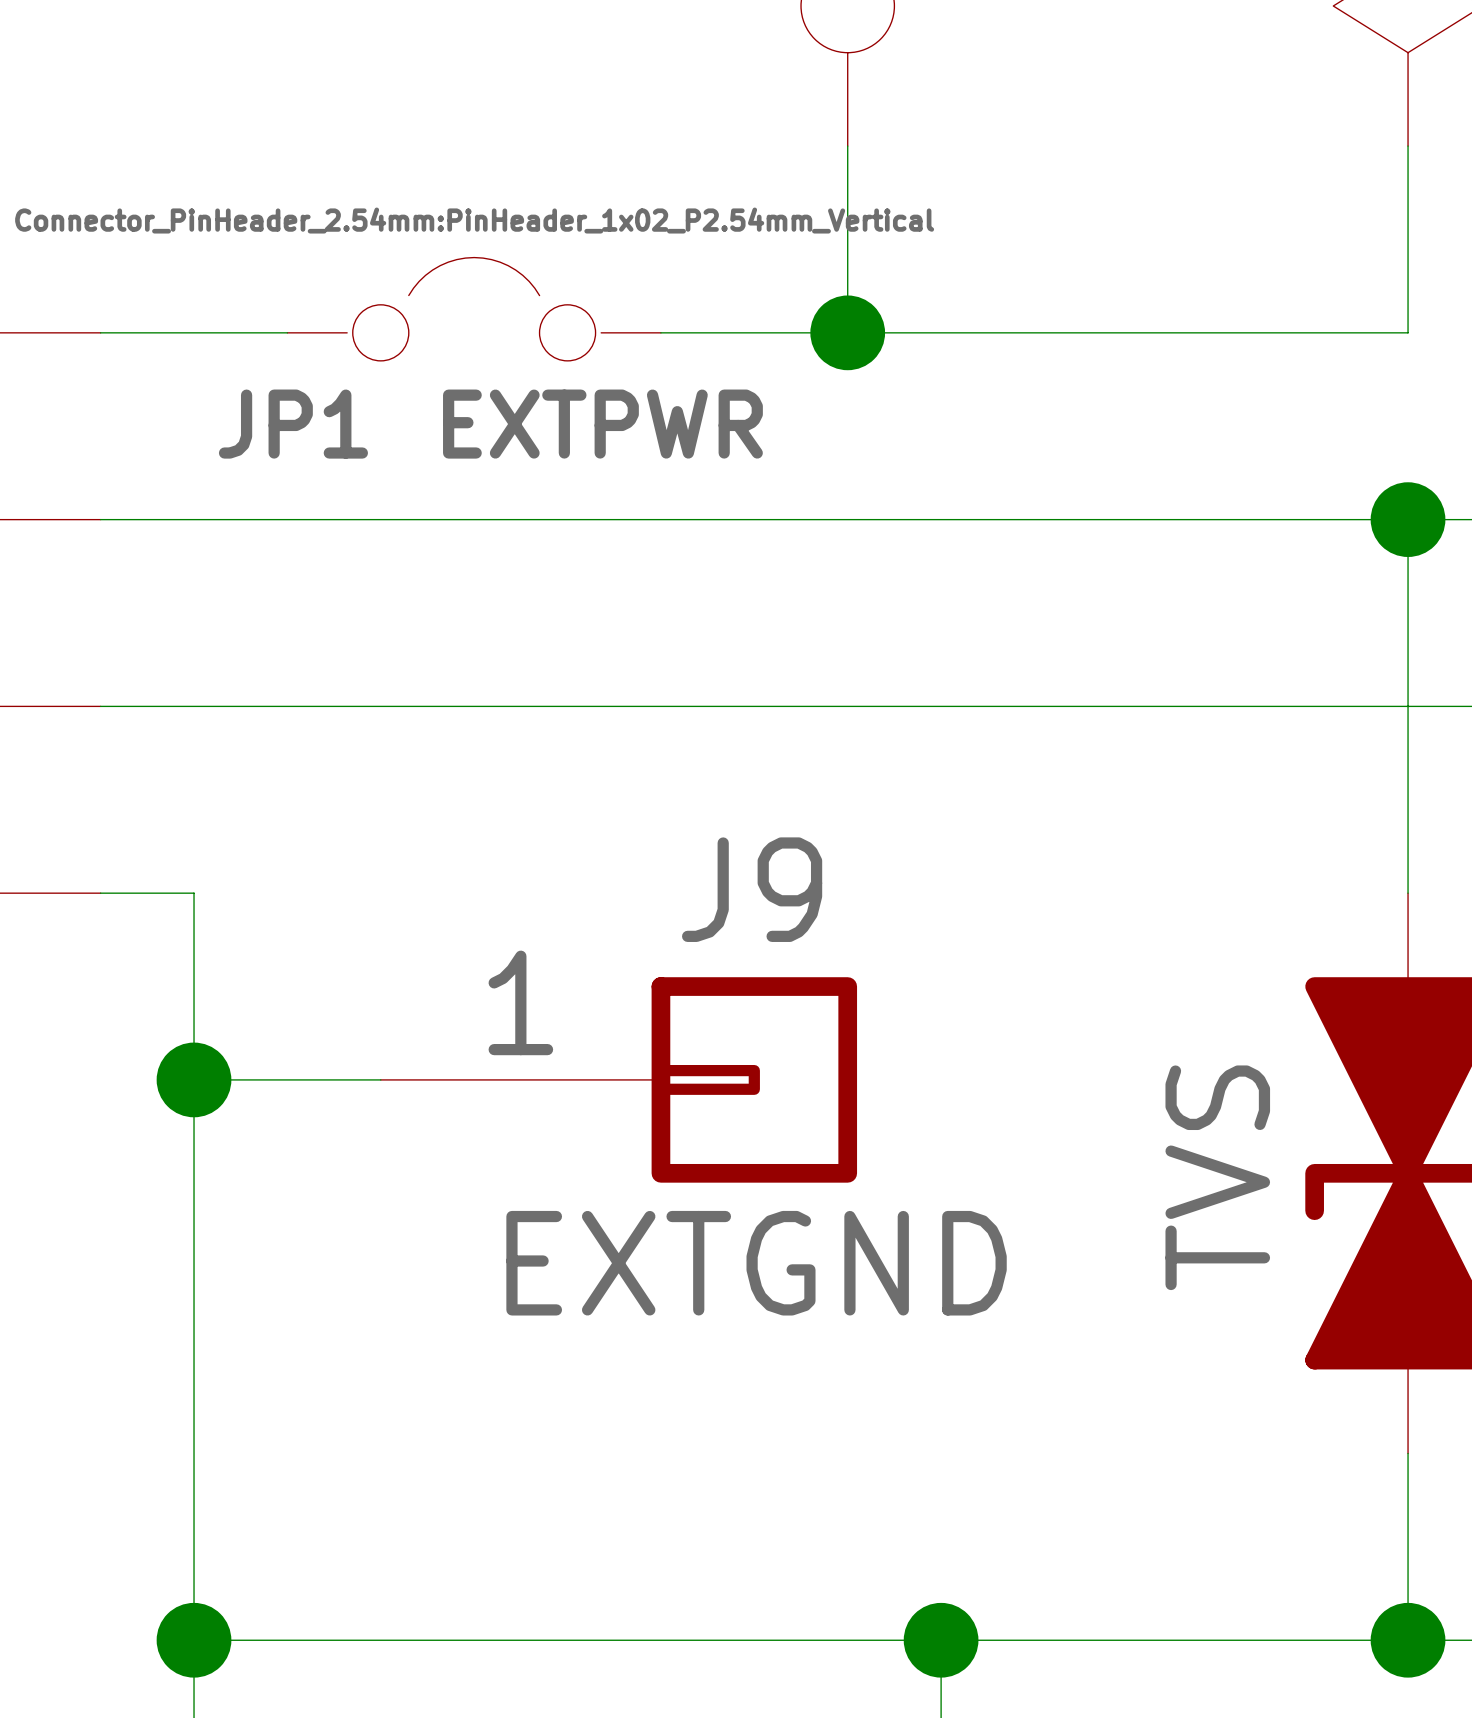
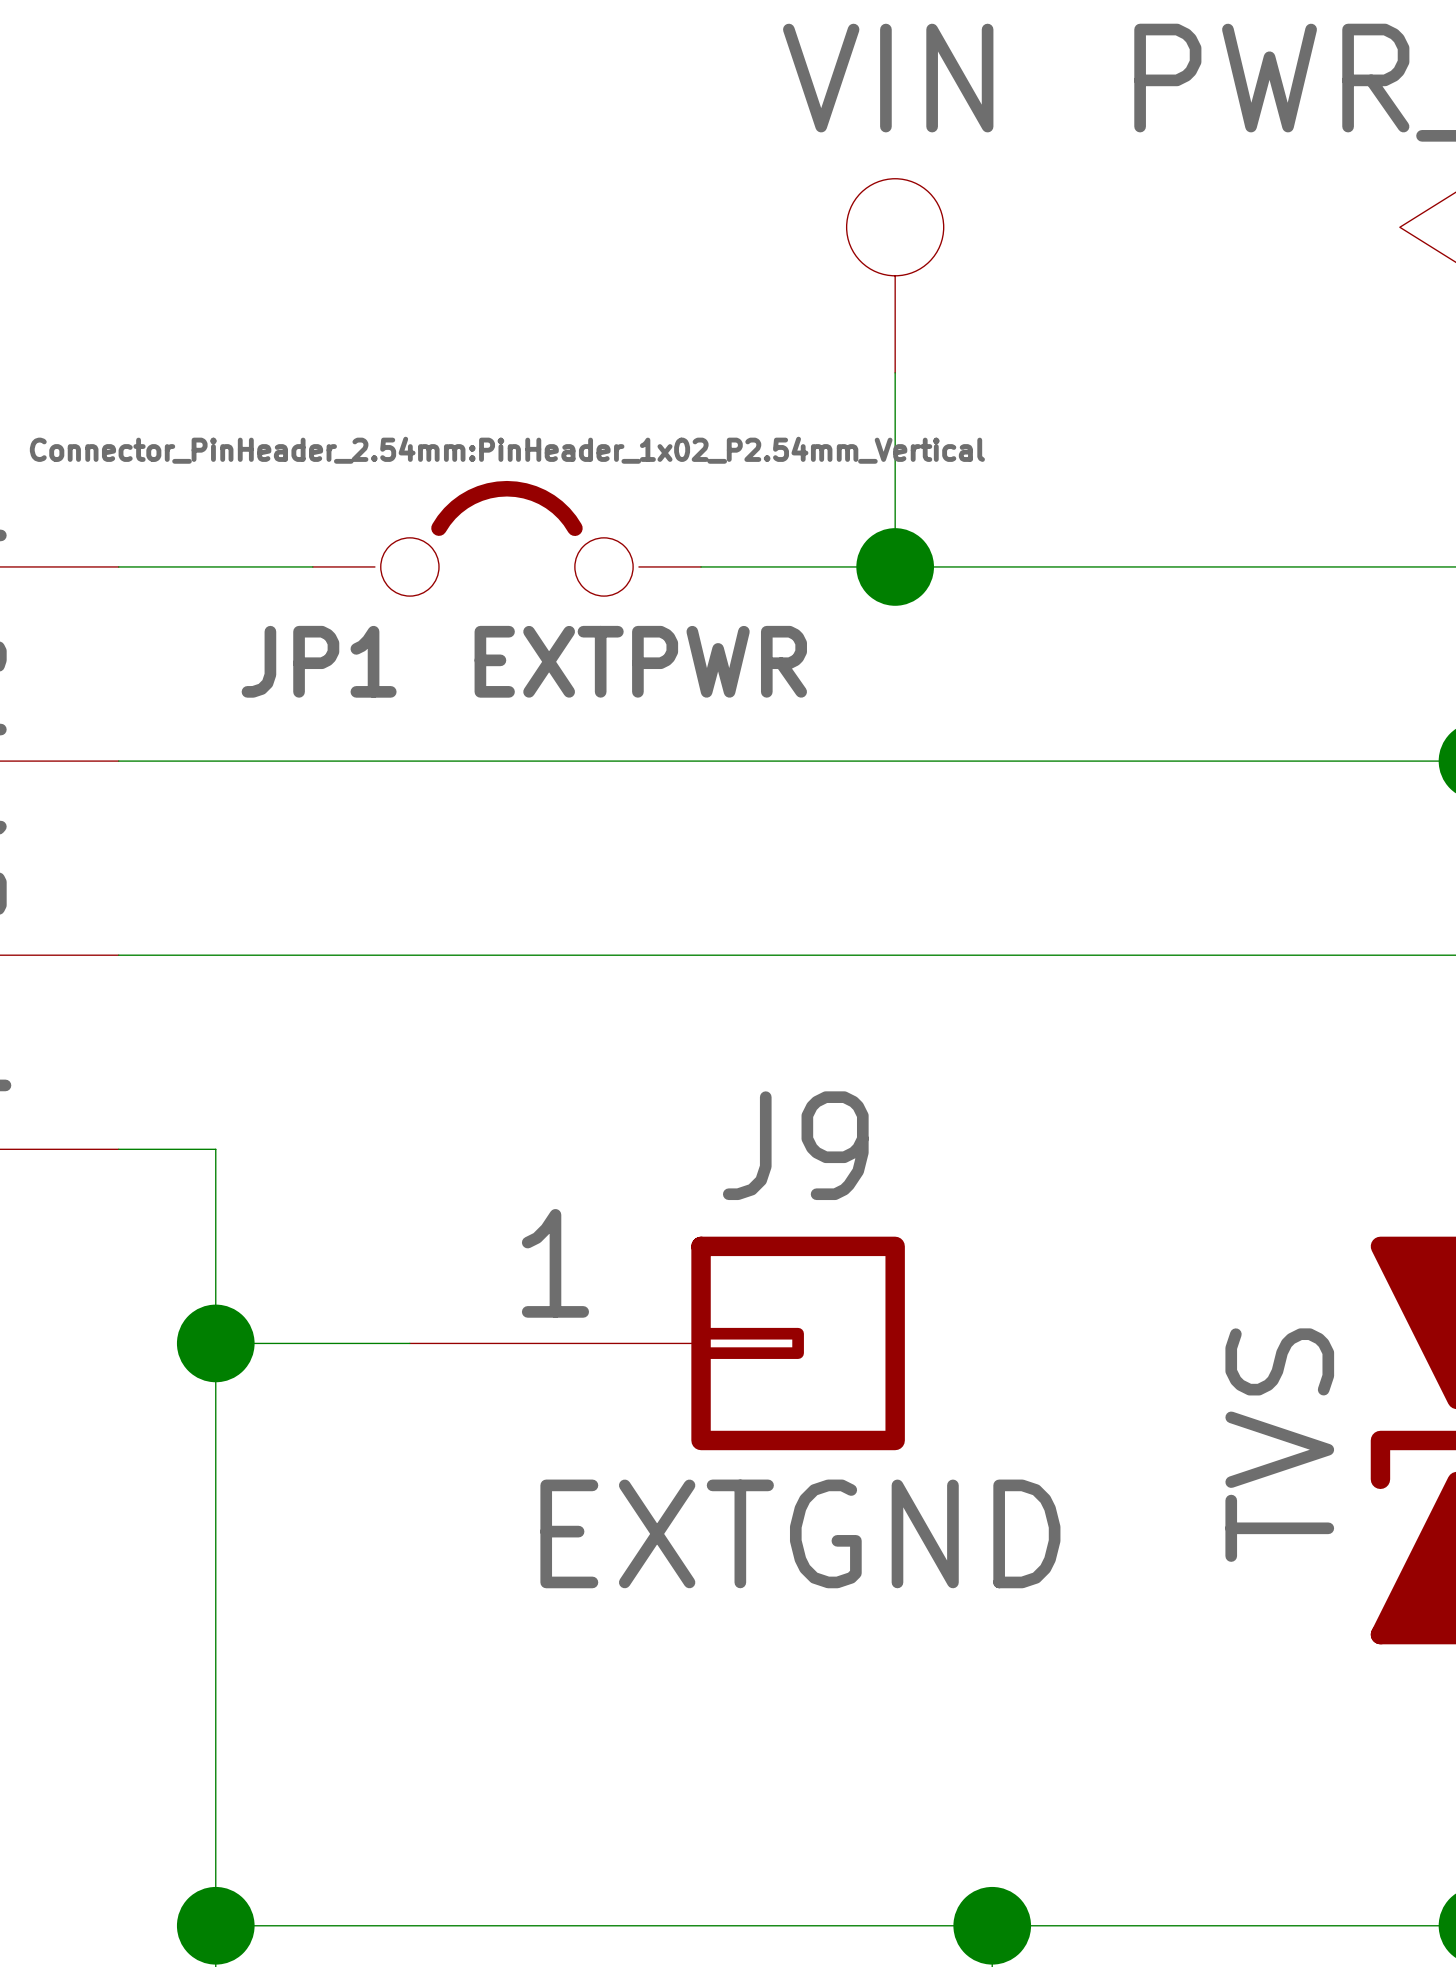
JP1 symbol: [287, 257, 661, 361] -> [312, 480, 702, 597]

